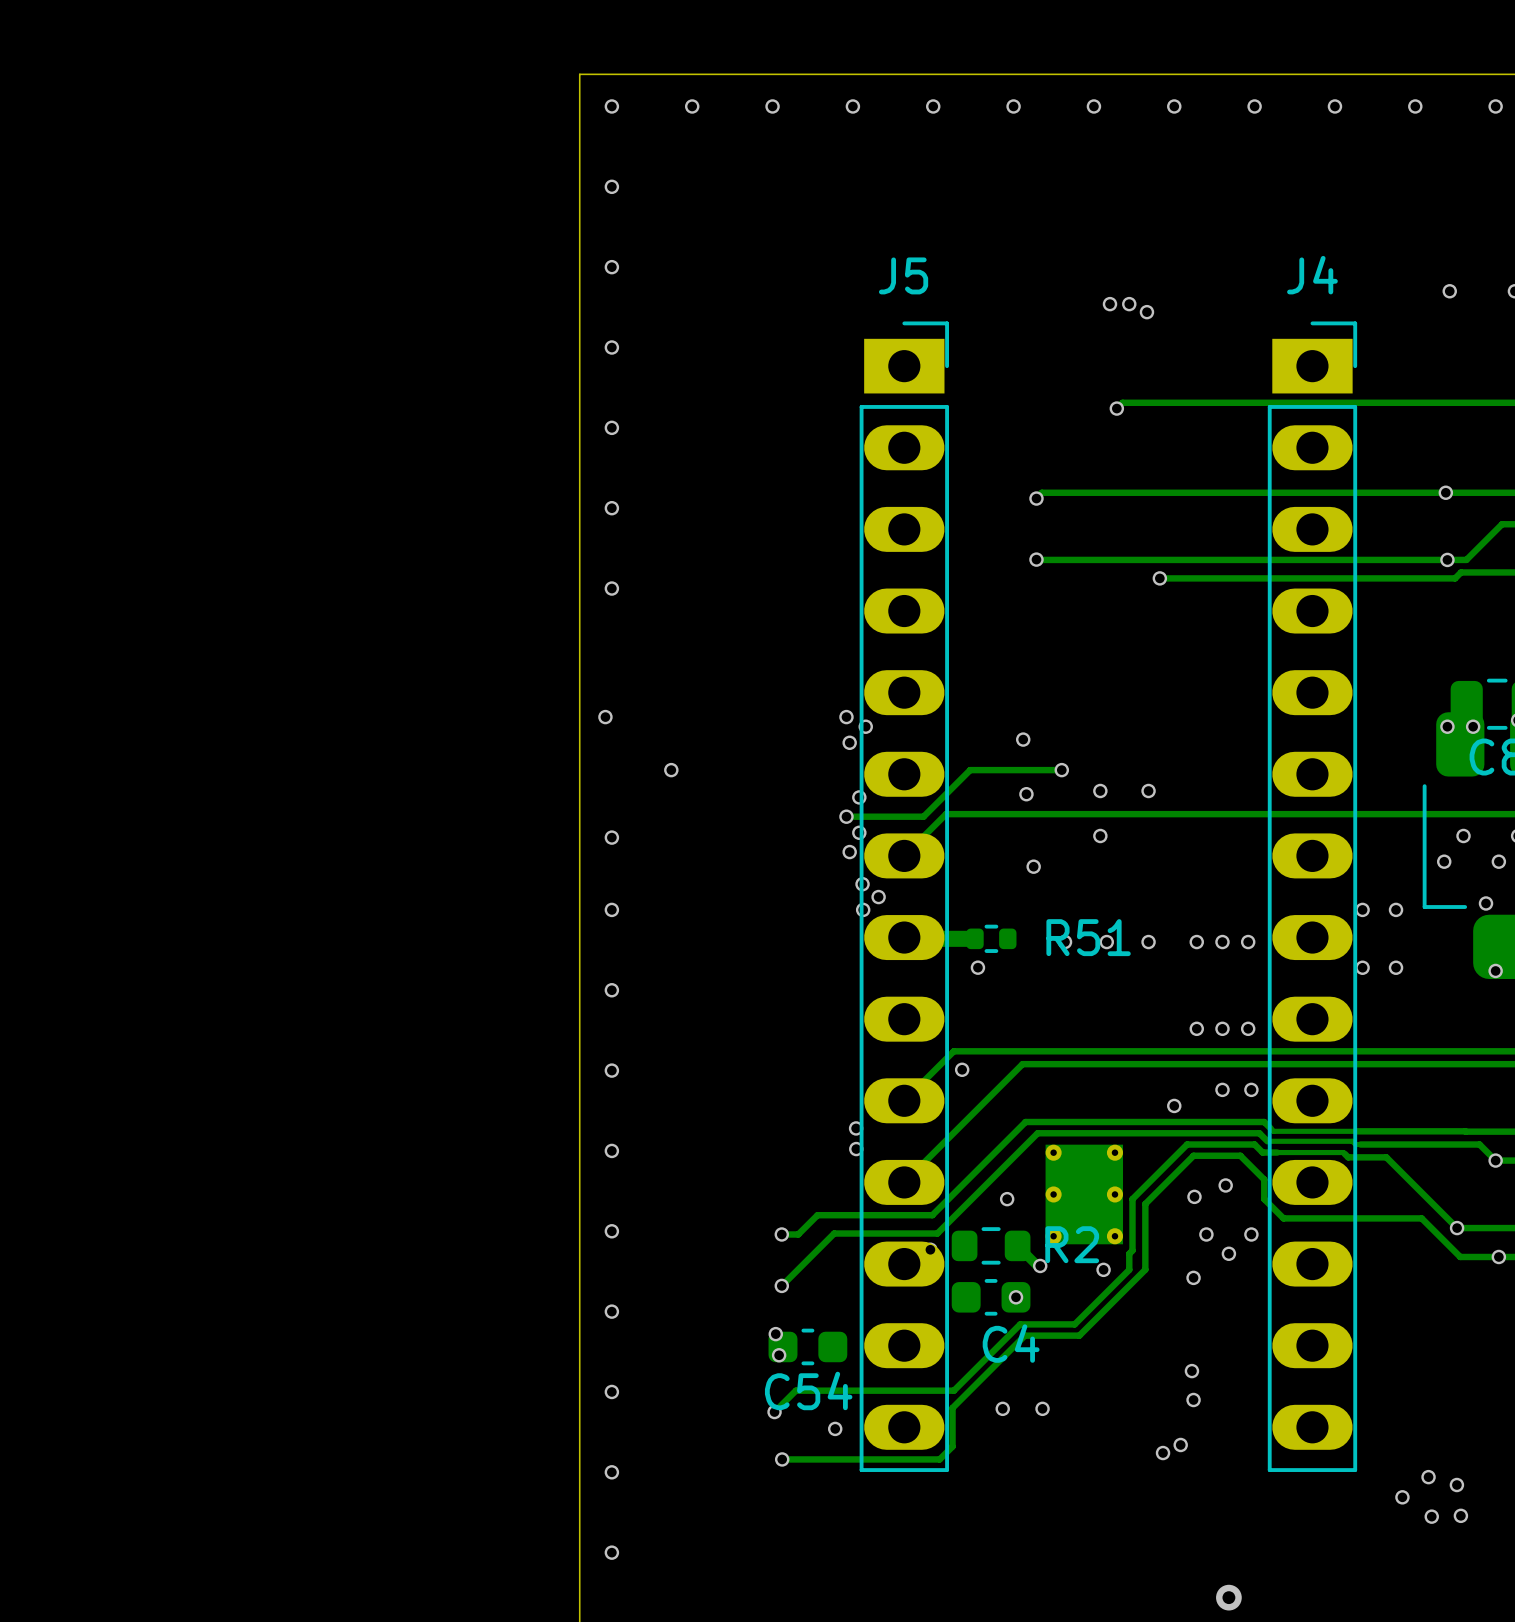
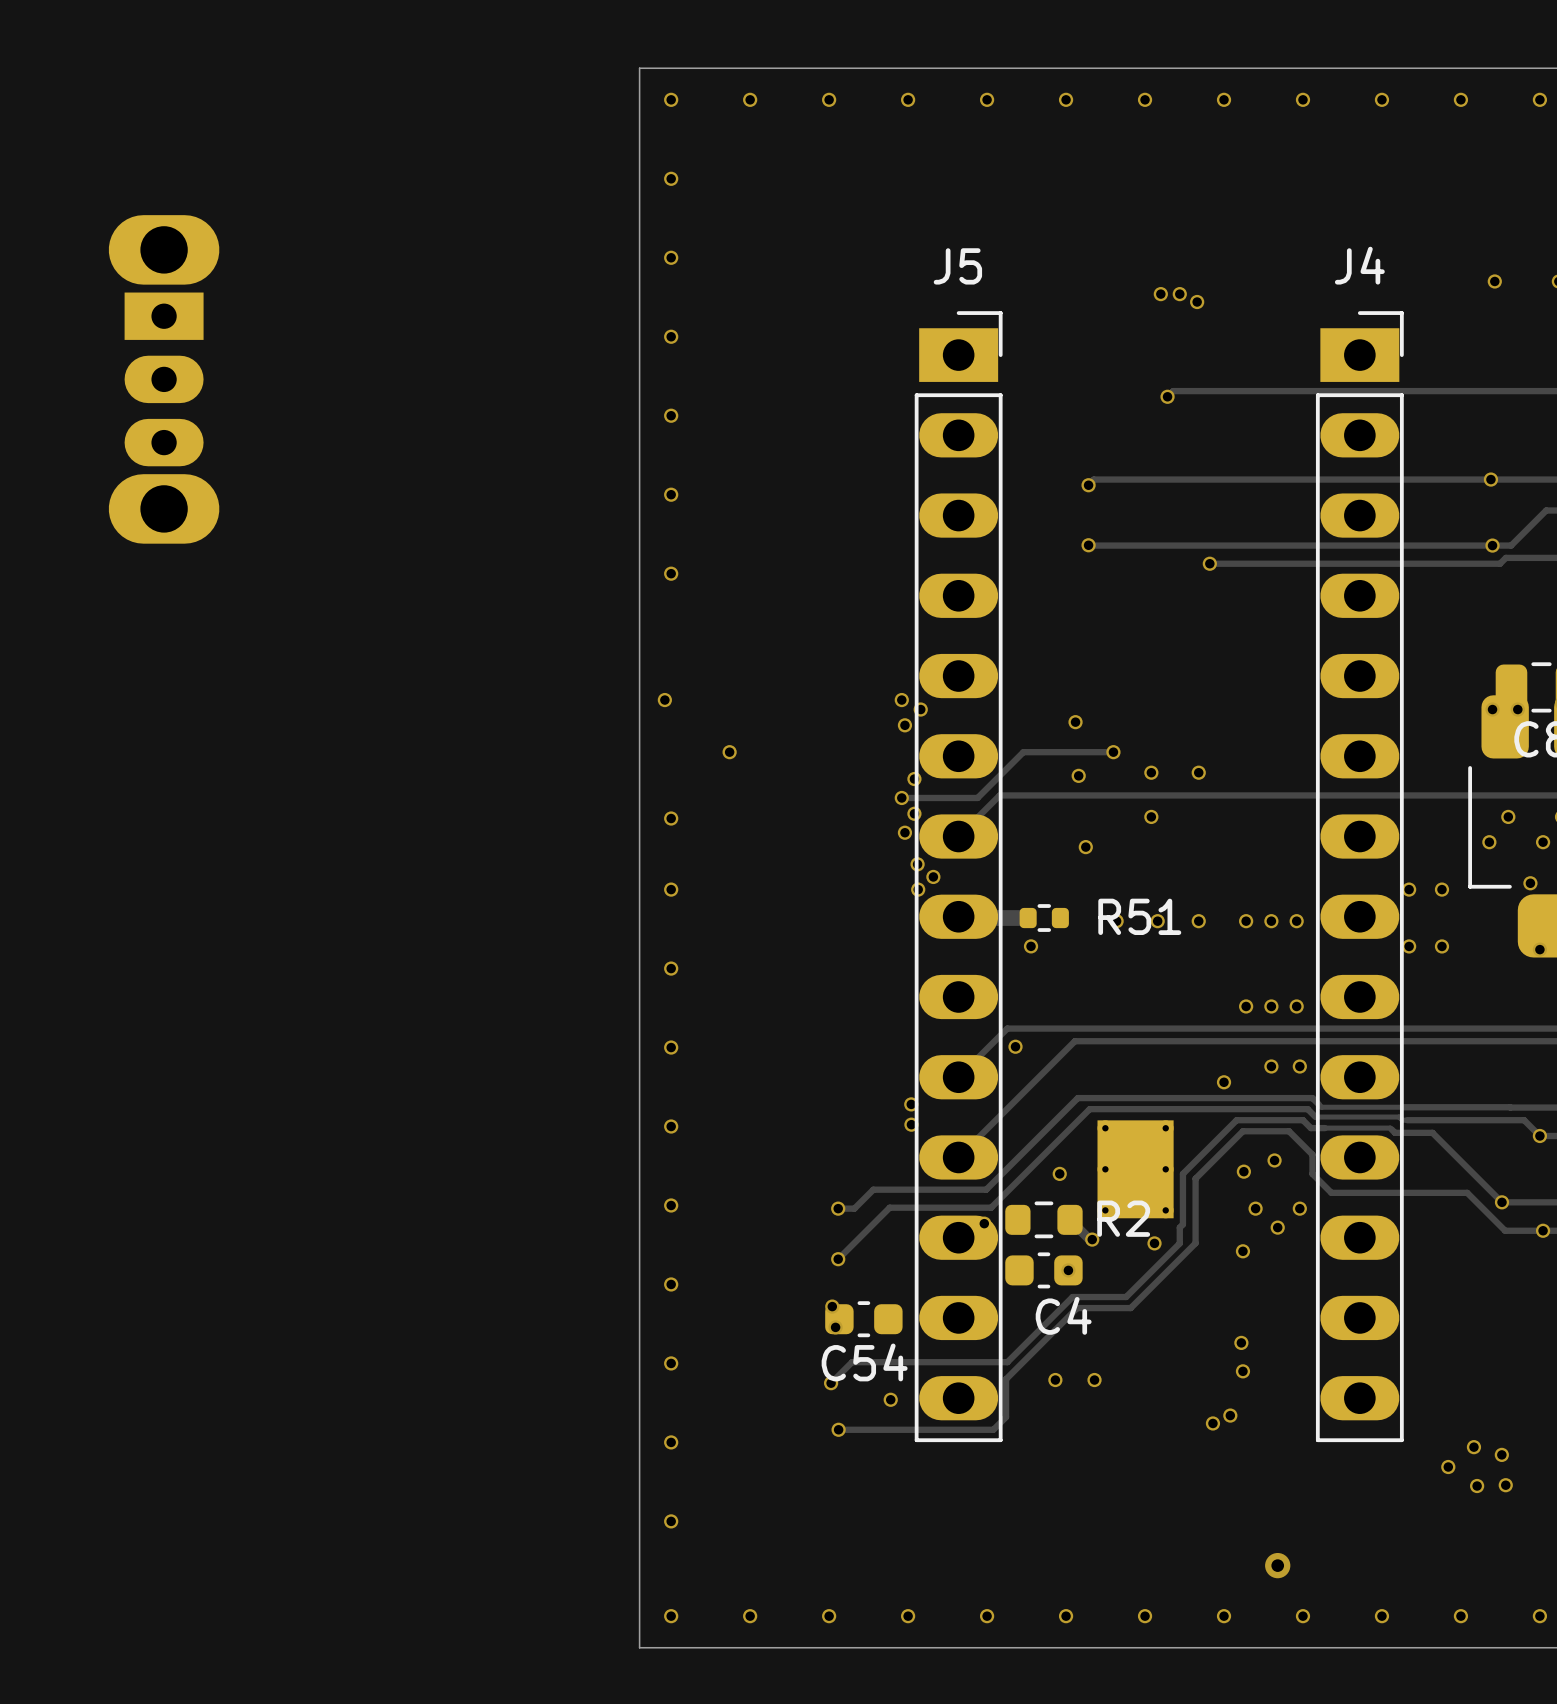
part: none -> (164, 379)

